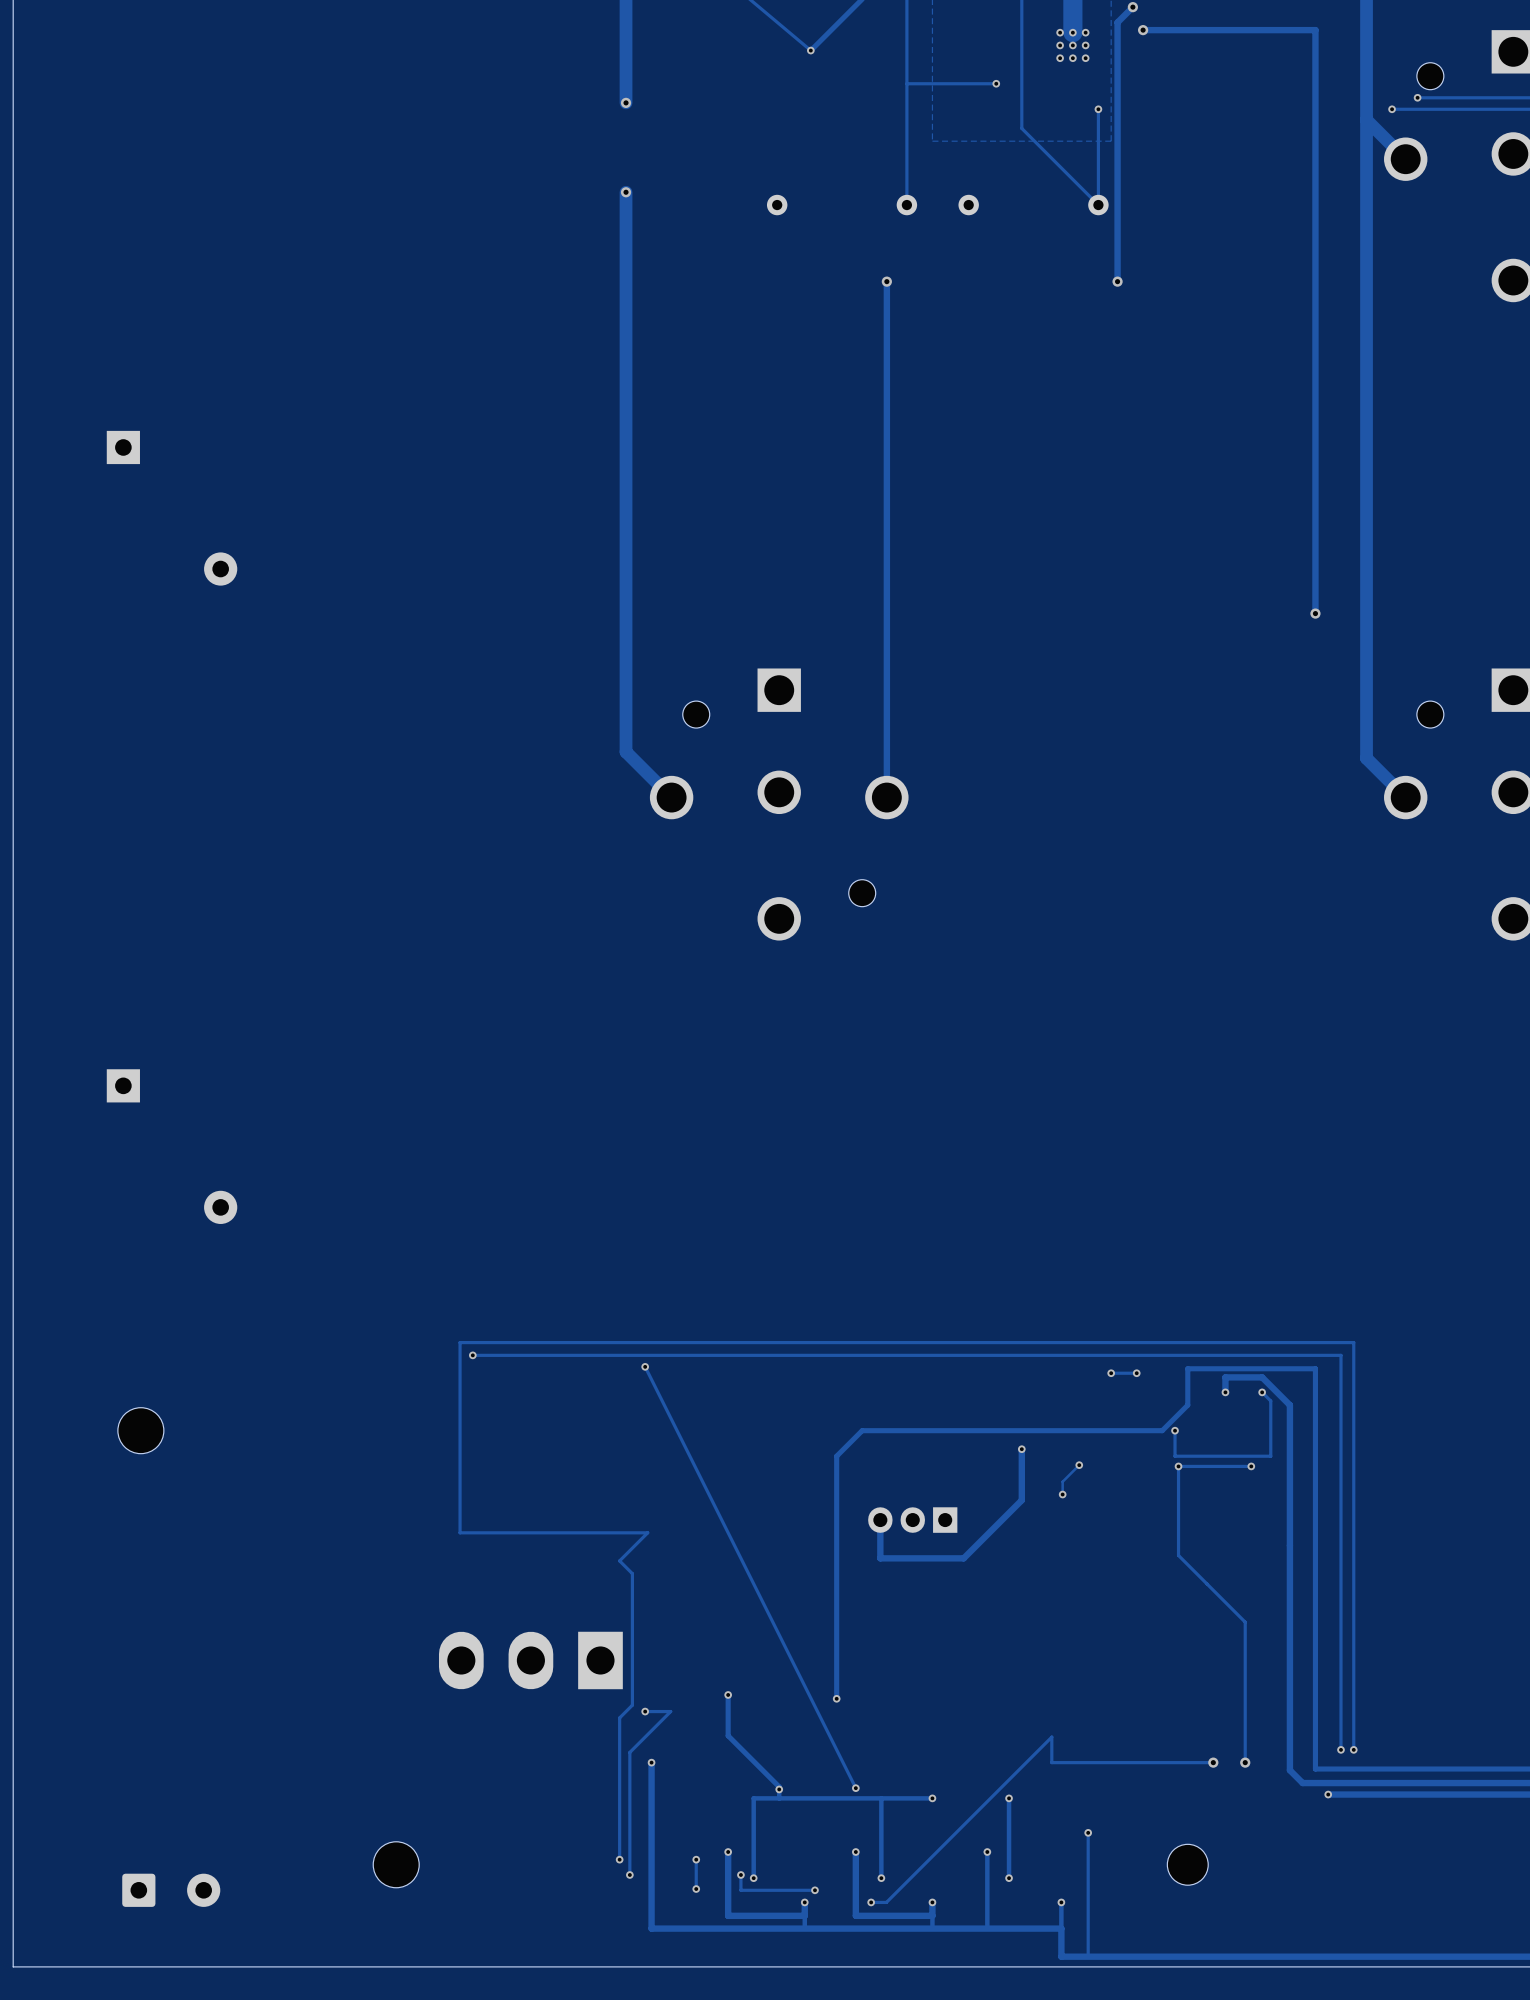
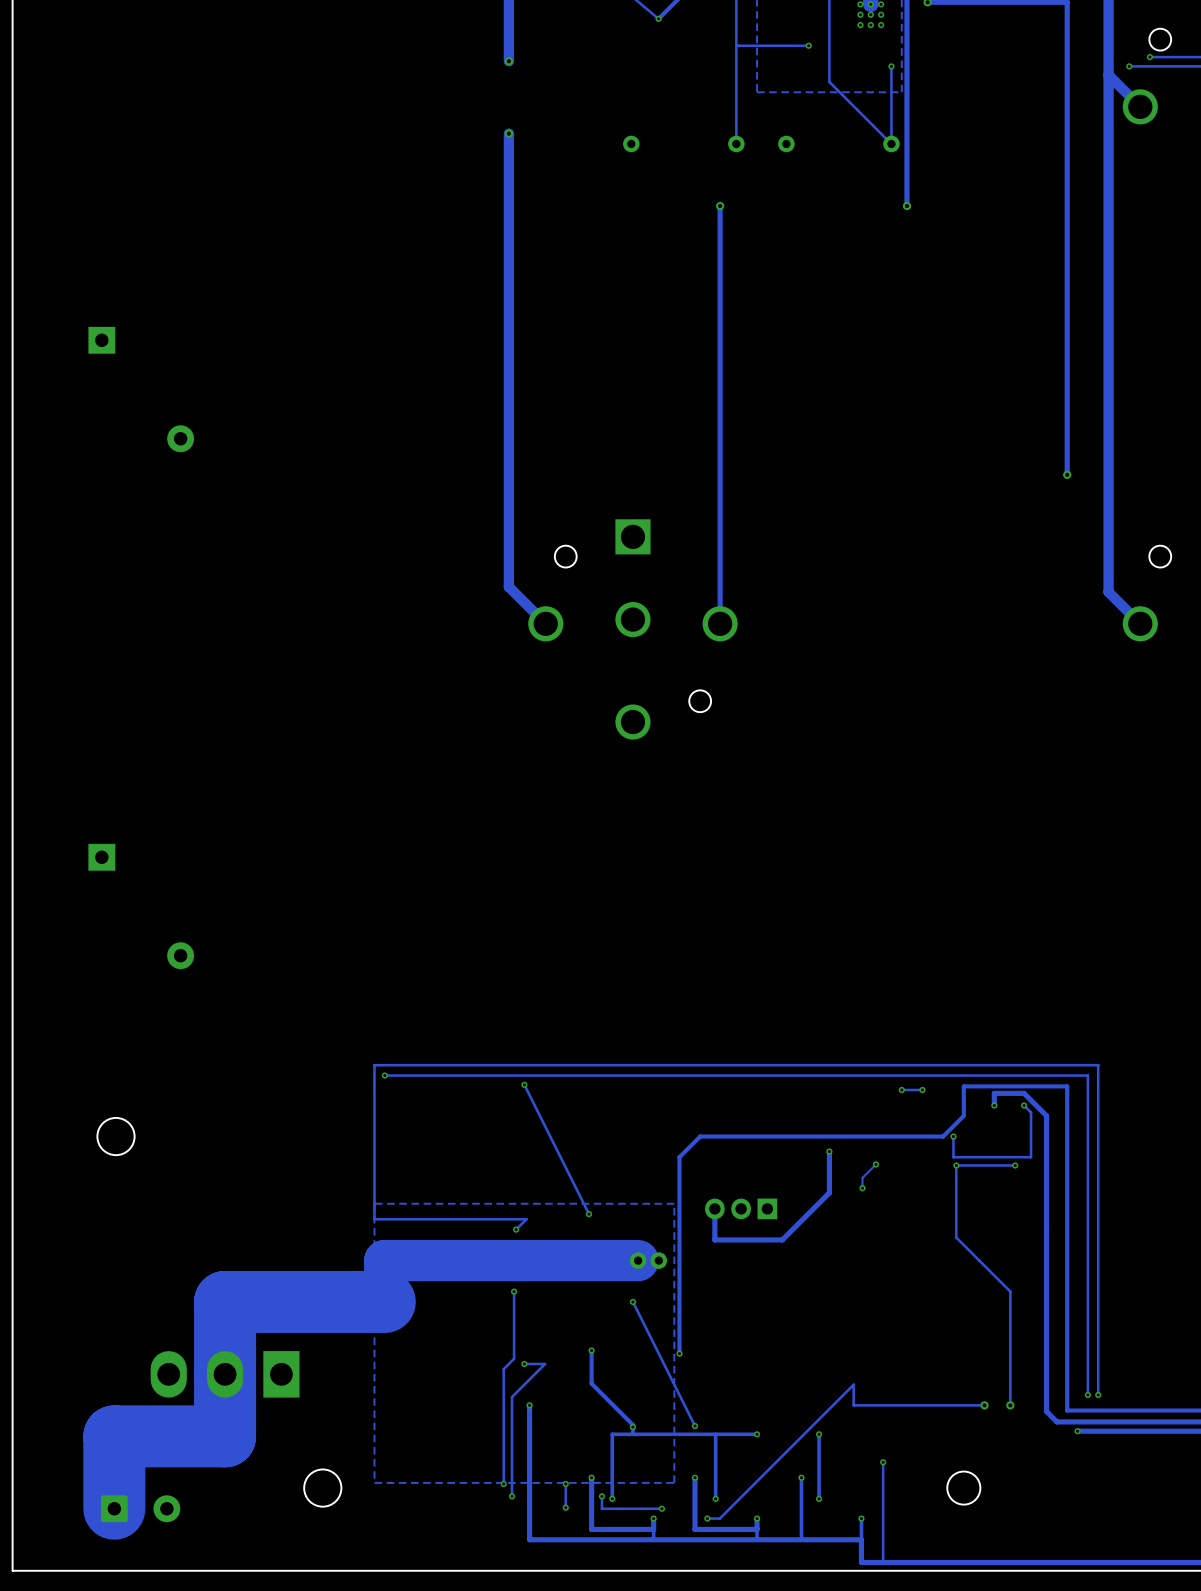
zone outline: none -> (674, 1203) (374, 1203) (374, 1482) (674, 1482) (674, 1203)
track: (724, 1526) (779, 1634) -> none
via: none -> (589, 1214)
track: (634, 1545) (619, 1560) (632, 1573) (632, 1622) -> none
via: none -> (516, 1229)
via: none -> (638, 1260)
track: none -> (658, 1260) (384, 1260) (384, 1301) (225, 1301) (225, 1436) (114, 1436) (114, 1508)
via: none -> (658, 1260)
via: none -> (514, 1291)
via: none -> (632, 1301)
part position: (530, 1660) -> (225, 1374)

